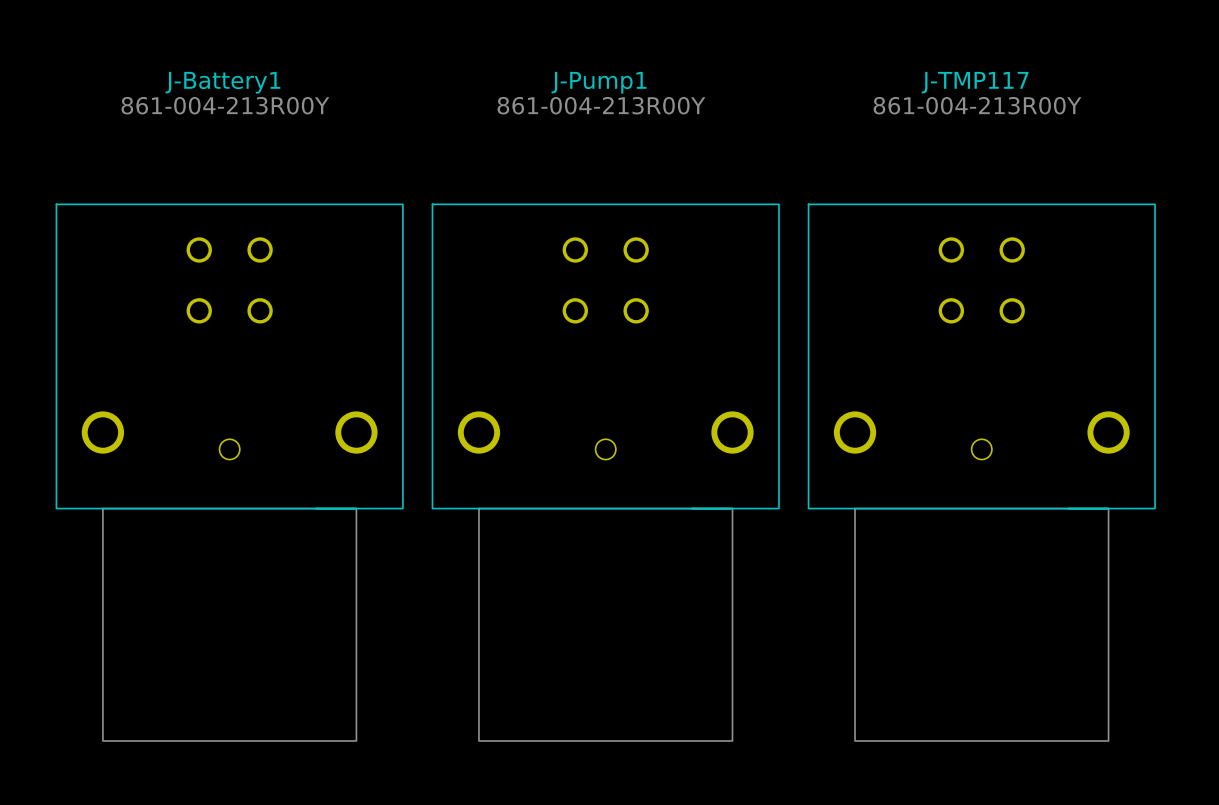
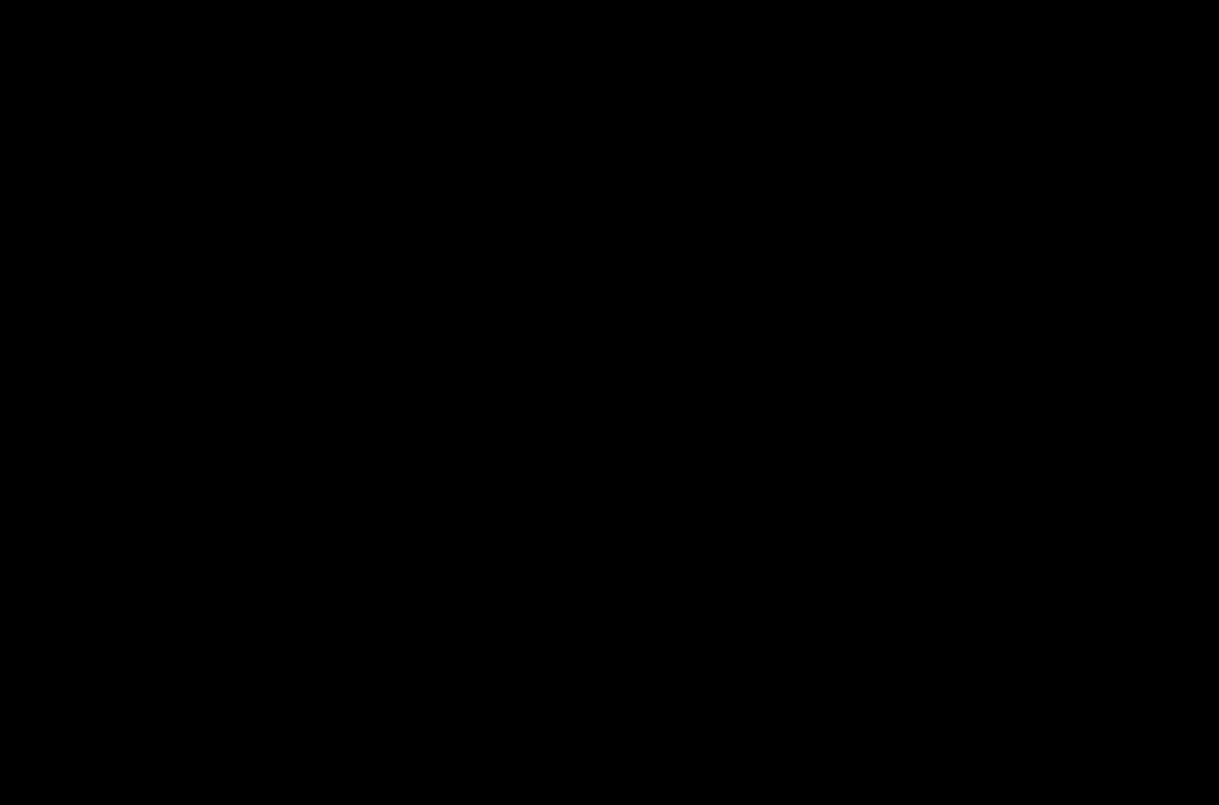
J-Battery1: 861-004-213R00Y (229, 472) -> none
J-Pump1: 861-004-213R00Y (605, 472) -> none
J-TMP117: 861-004-213R00Y (981, 472) -> none

